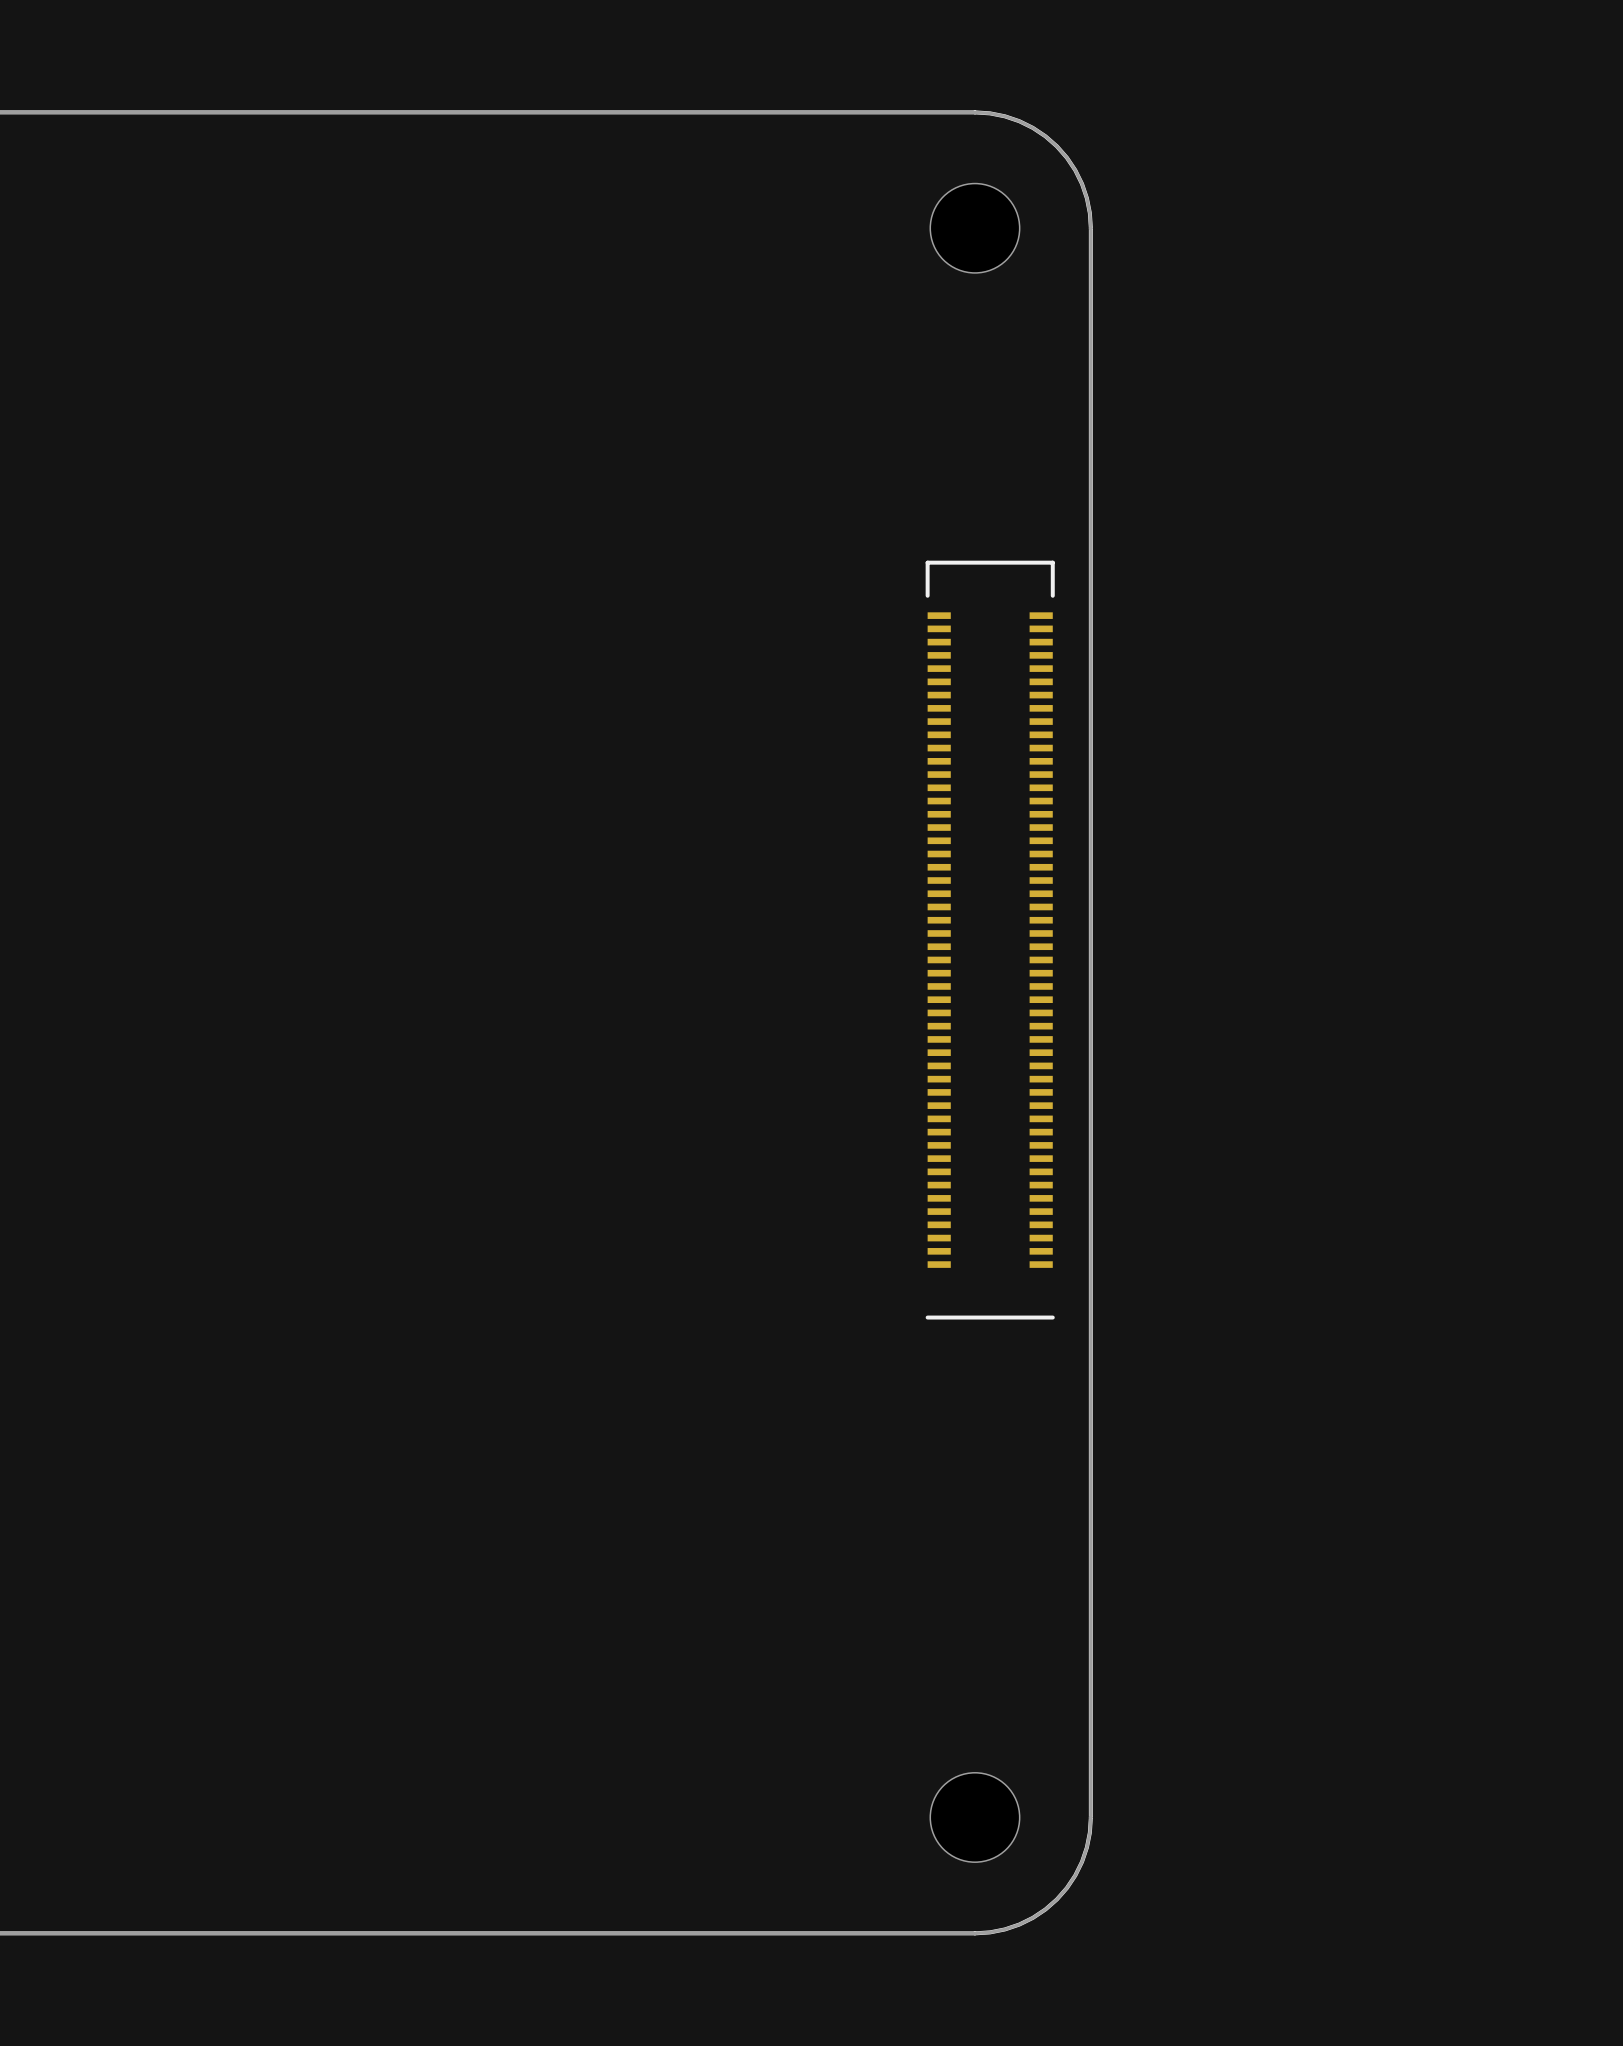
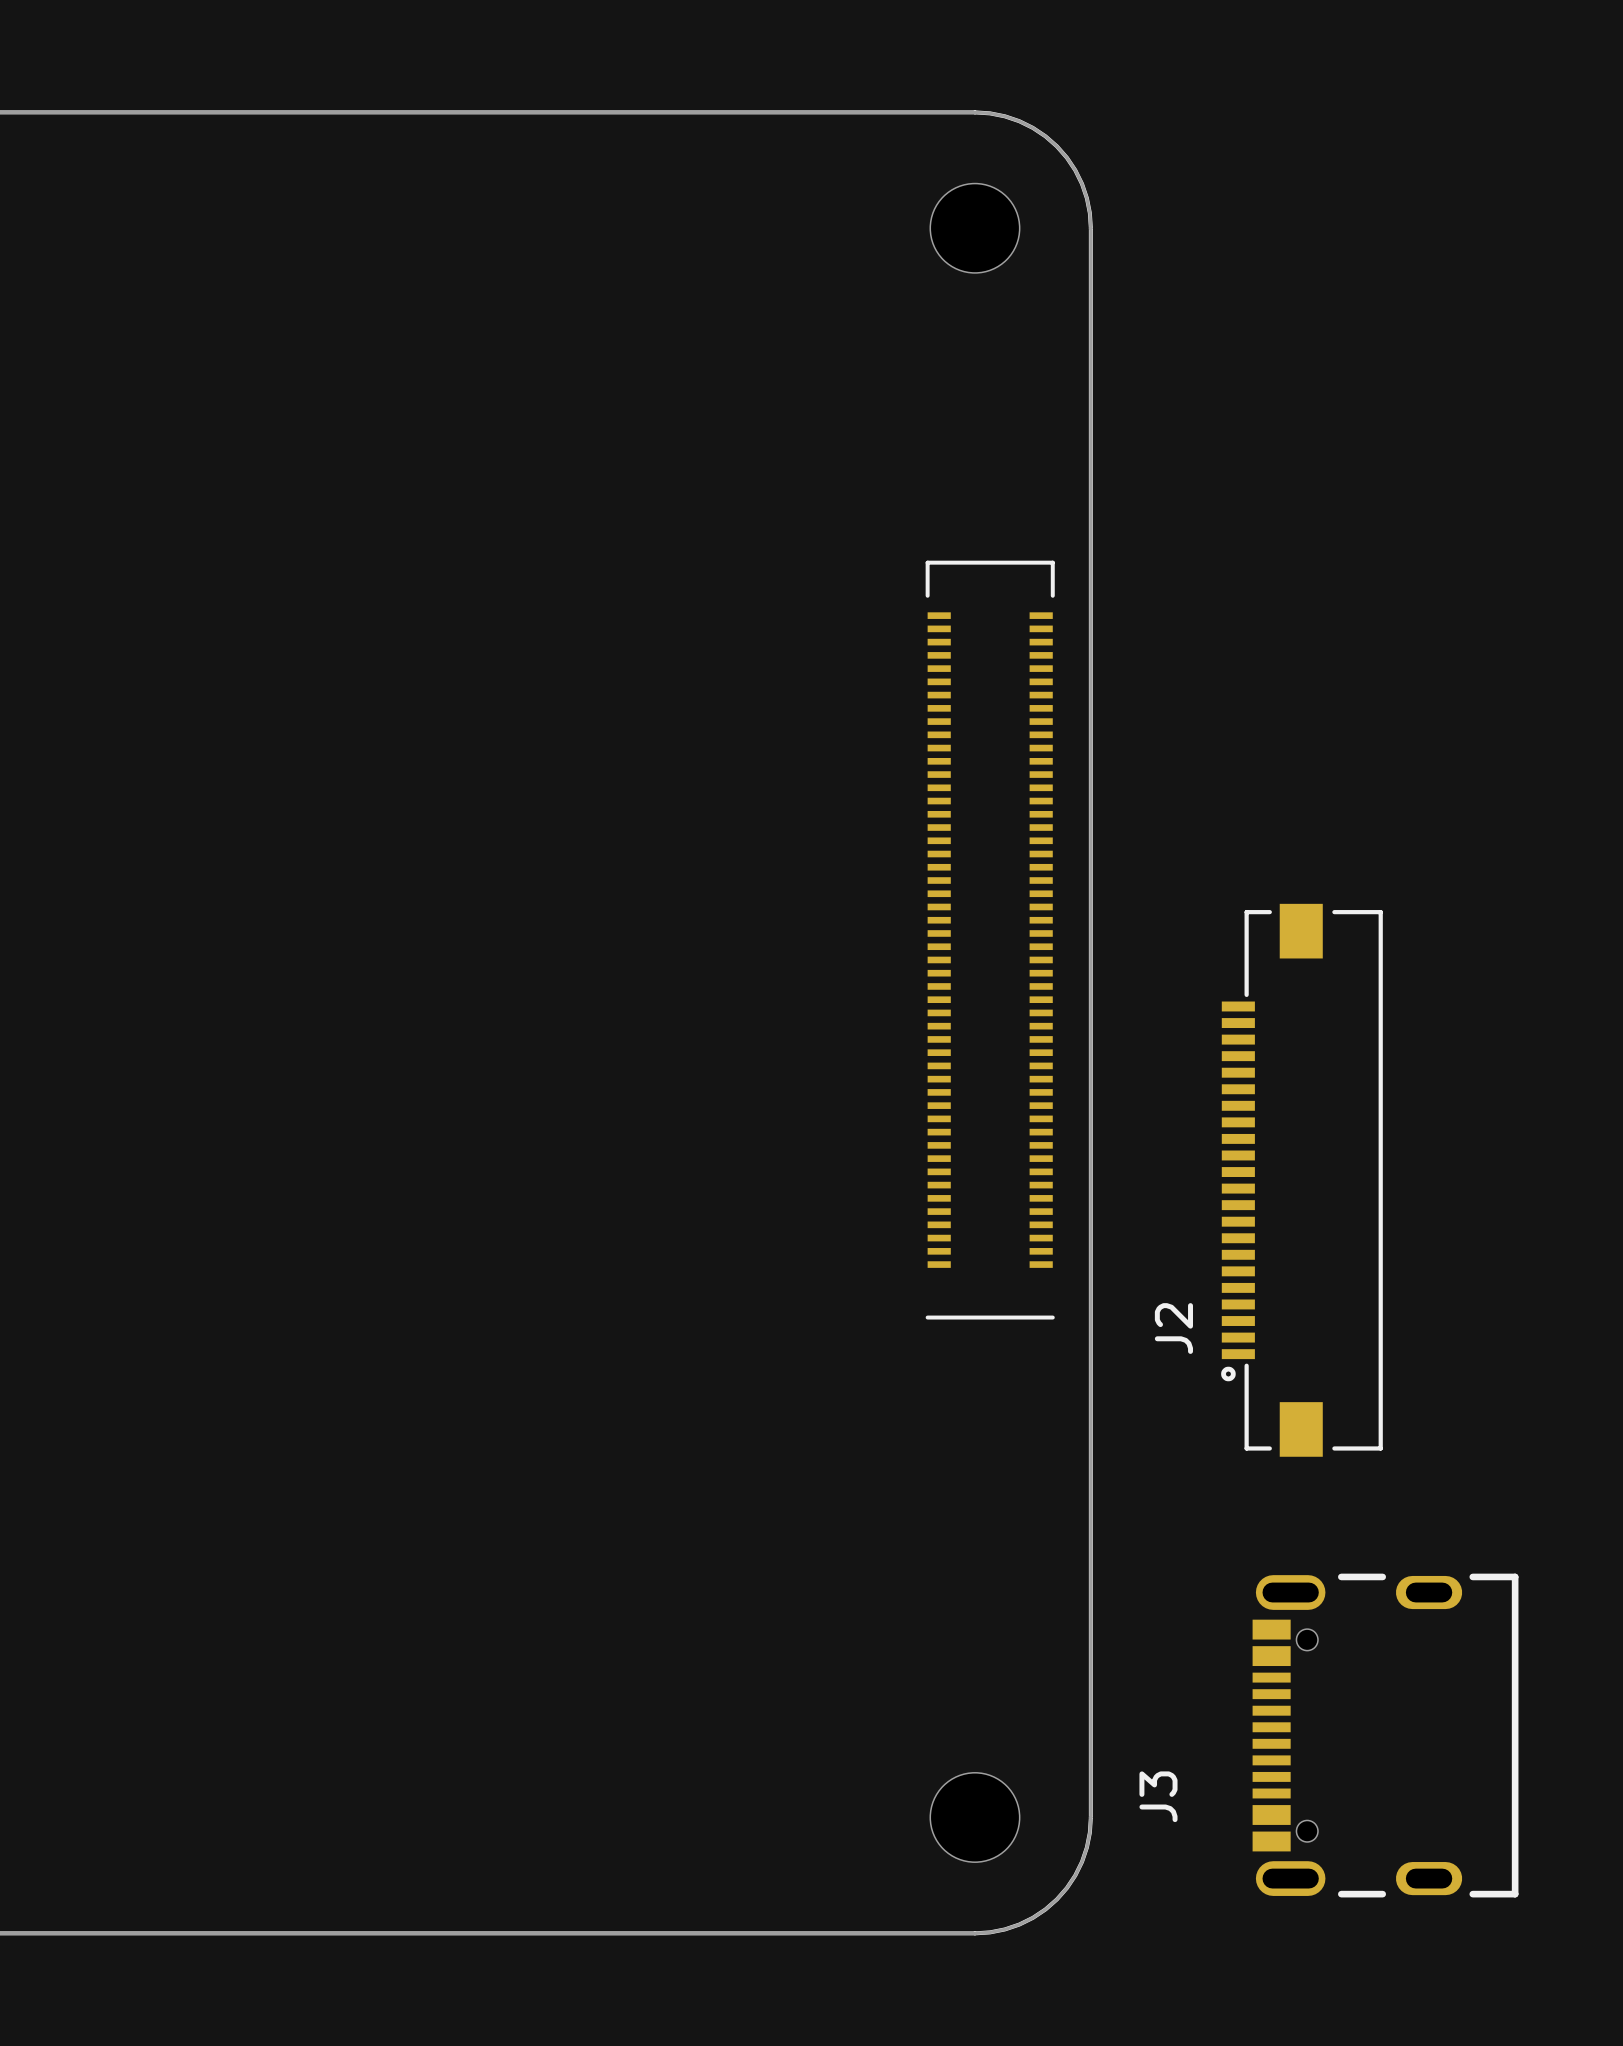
J2: none -> (1301, 1180)
J3: none -> (1385, 1735)

